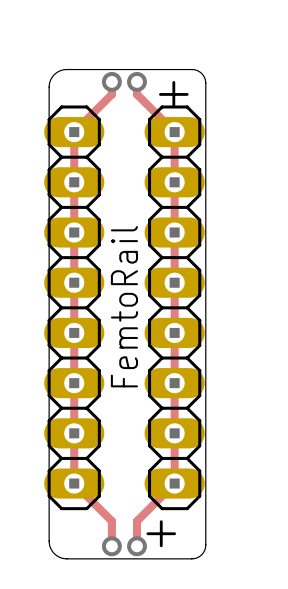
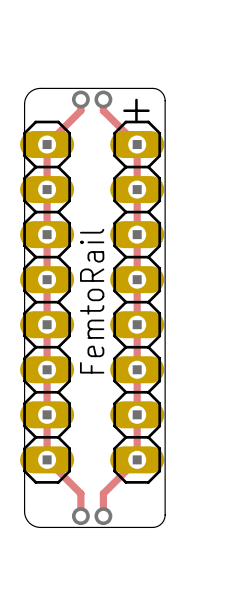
text: + (161, 533) -> none

